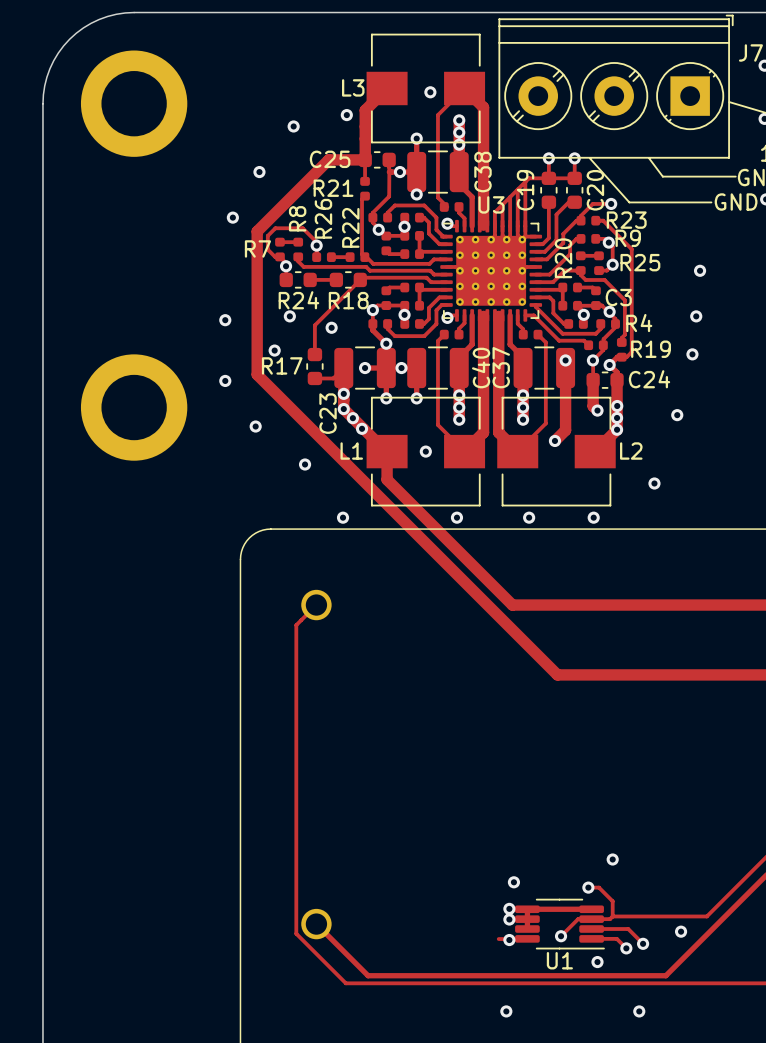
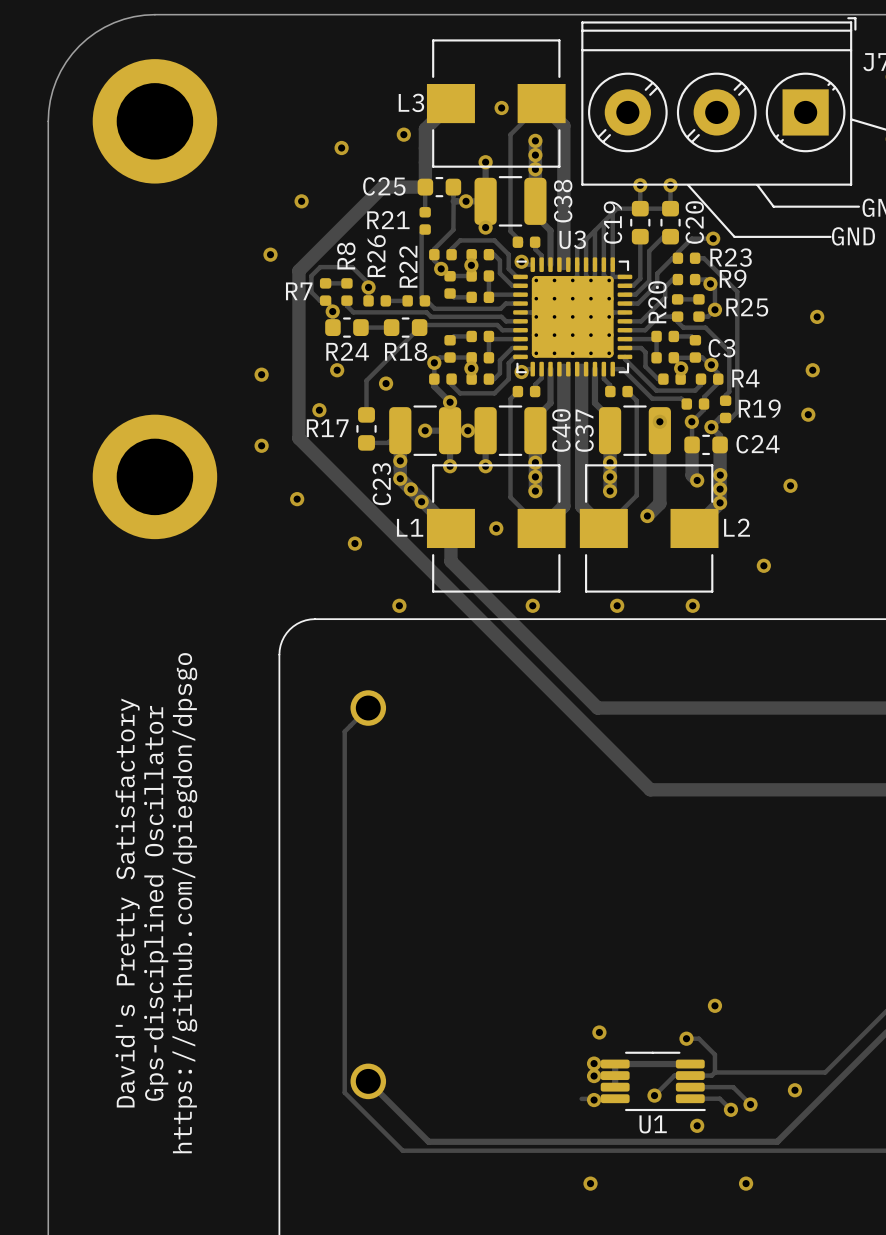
text: none -> David's Pretty Satisfactory (127, 903)
text: none -> Gps-disciplined Oscillator (156, 903)
text: none -> https://github.com/dpiegdon/dpsgo (184, 903)

